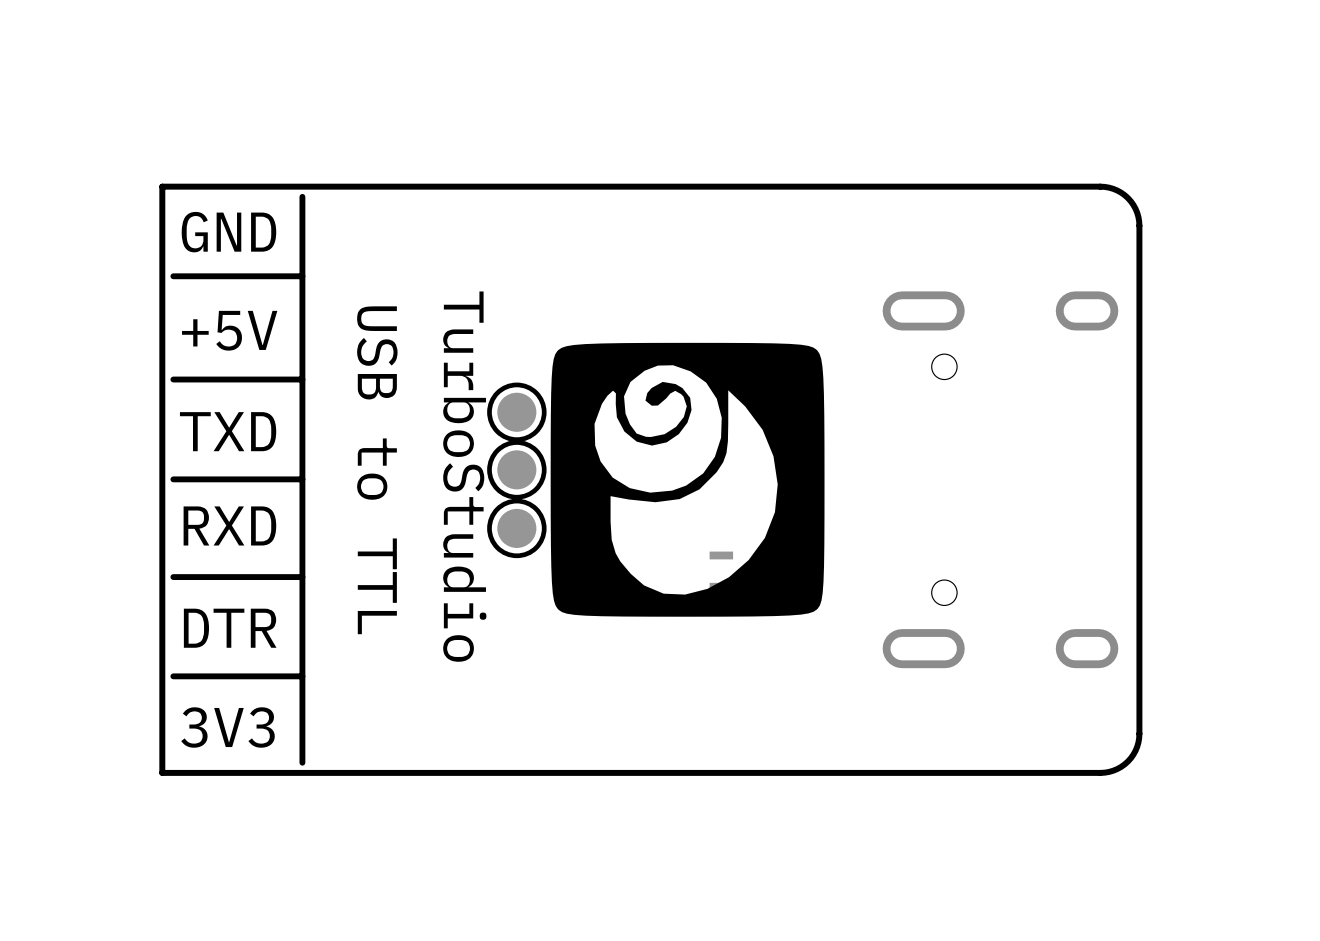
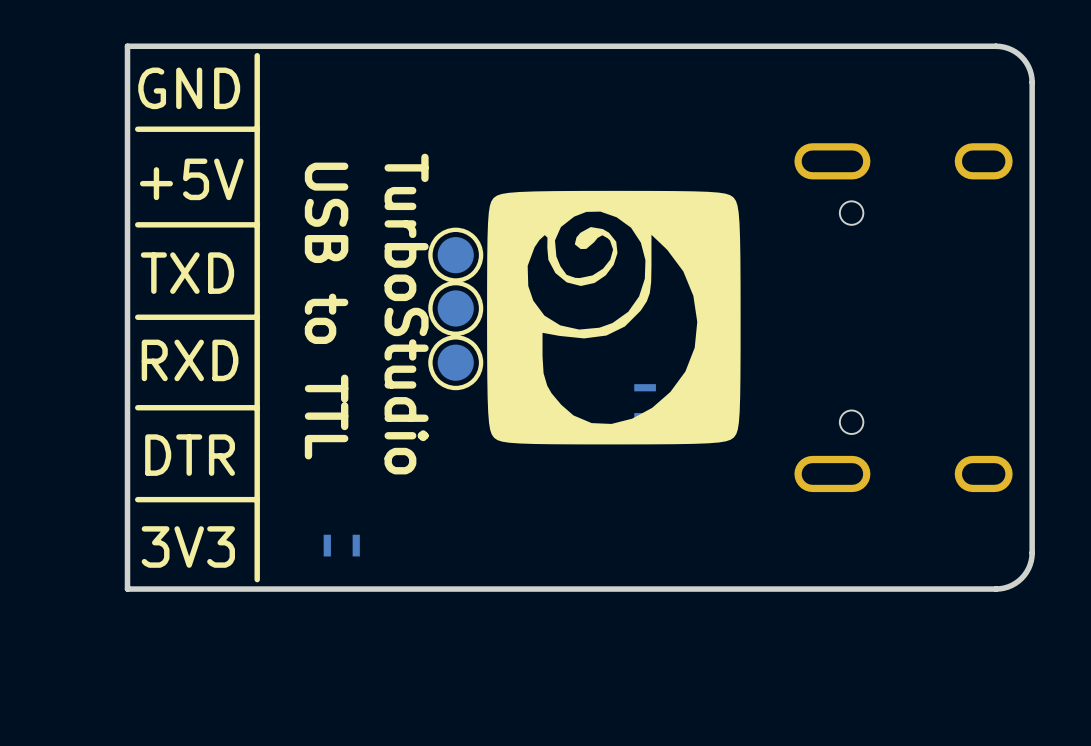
part: none -> (341, 545)

